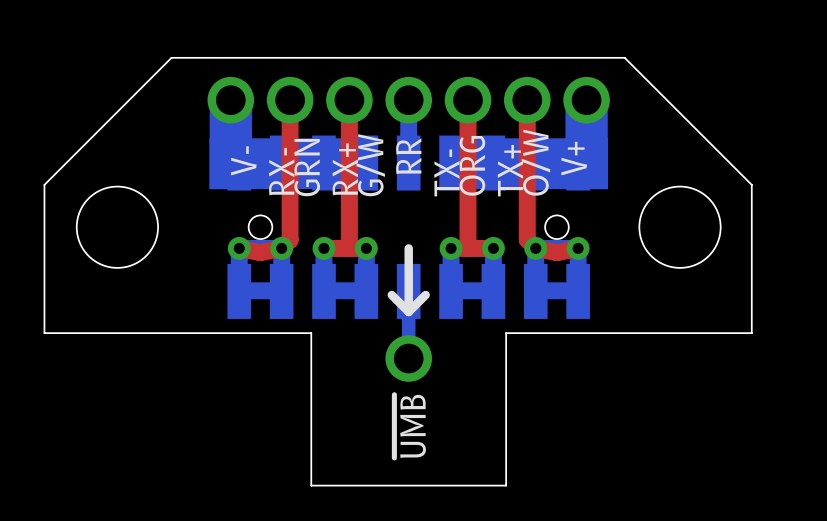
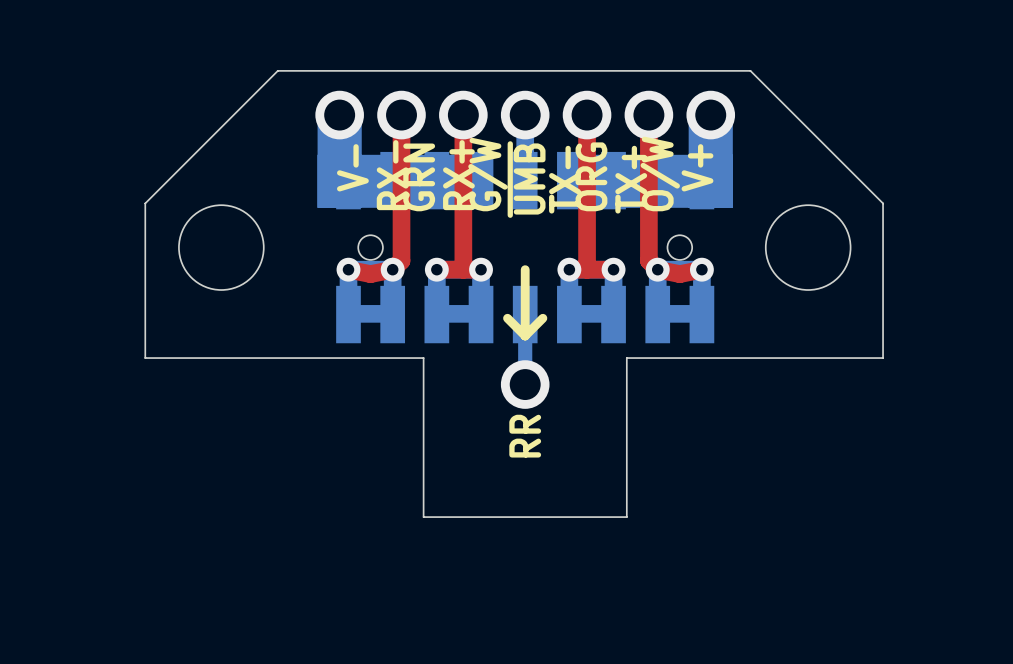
text position: RR (408, 156) -> RR (525, 436)
text position: ~{UMB} (410, 426) -> ~{UMB} (526, 179)

